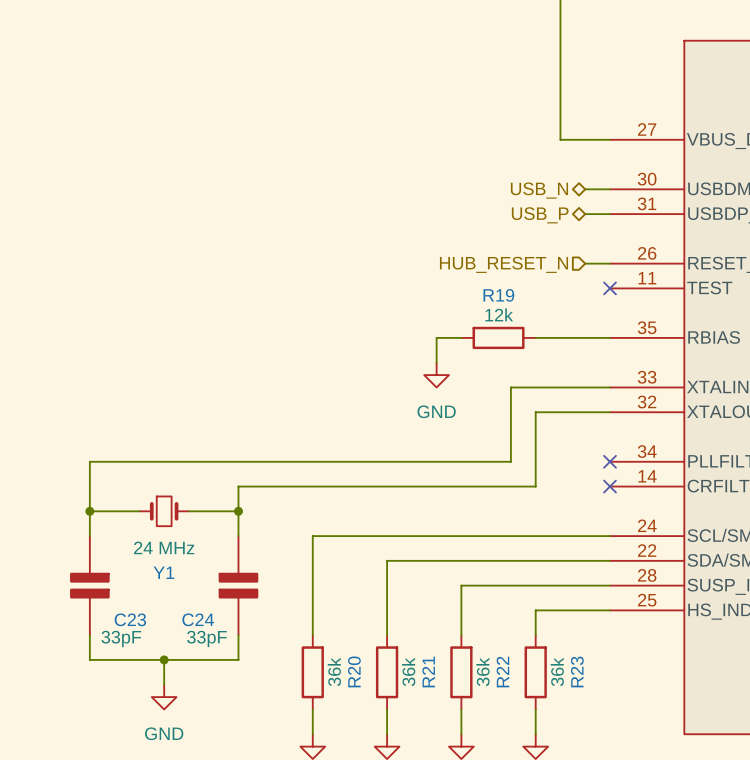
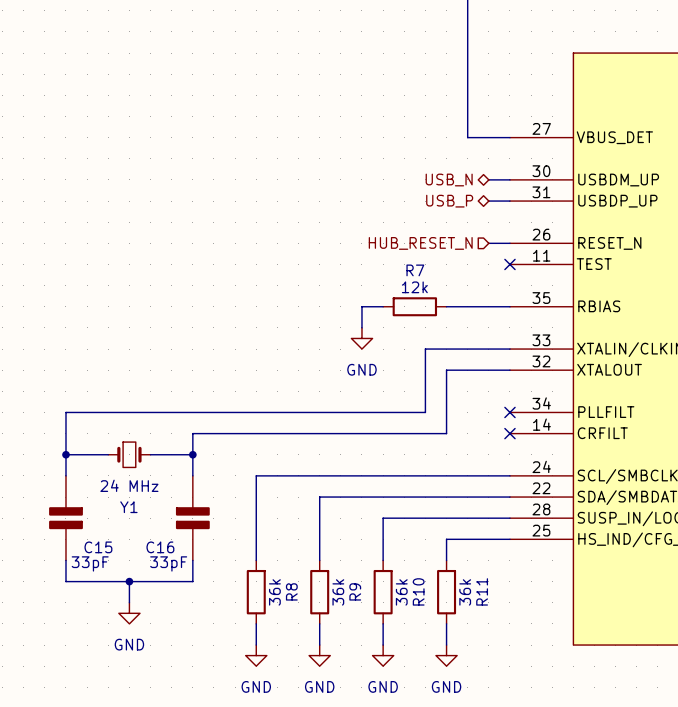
R19 name: R19 (498, 295) -> R7 (415, 270)
C23 name: C23 (130, 619) -> C15 (98, 547)
C24 name: C24 (198, 619) -> C16 (160, 547)
R20 name: R20 (354, 671) -> R8 (291, 591)
R23 name: R23 (577, 671) -> R11 (482, 591)
R21 name: R21 (428, 672) -> R9 (355, 591)
R22 name: R22 (502, 672) -> R10 (418, 591)

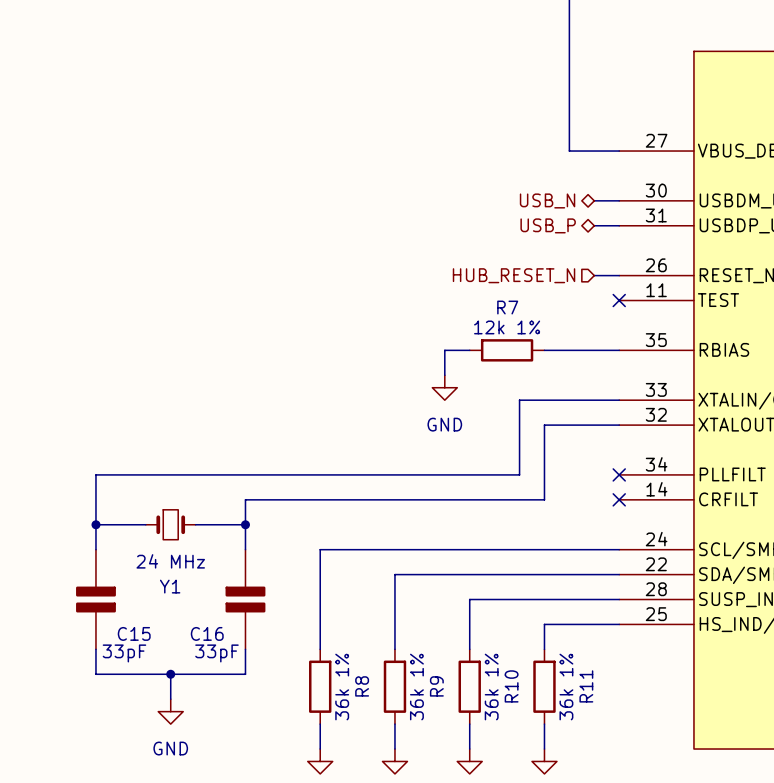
R7 value: 12k (414, 287) -> 12k 1% (507, 327)
R8 value: 36k (274, 592) -> 36k 1% (342, 687)
R9 value: 36k (338, 592) -> 36k 1% (416, 687)
R10 value: 36k (401, 592) -> 36k 1% (491, 687)
R11 value: 36k (465, 592) -> 36k 1% (566, 687)

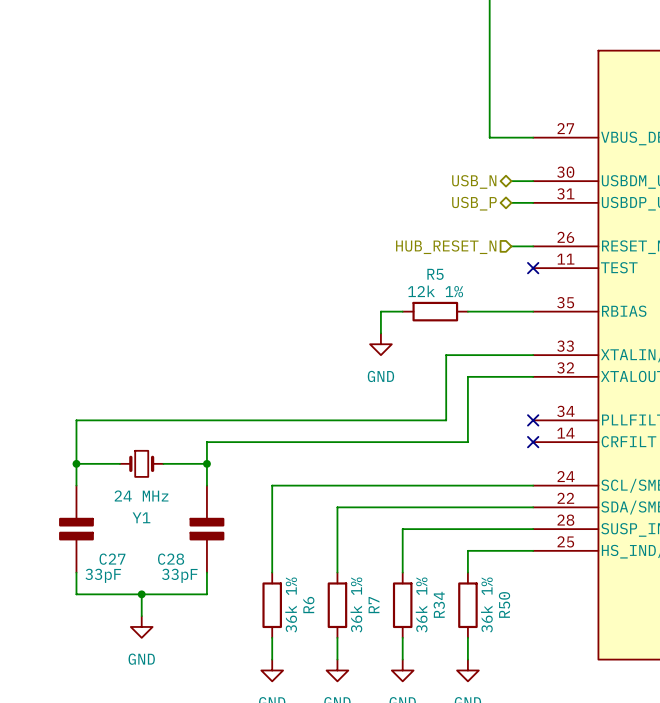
R7 name: R7 (507, 307) -> R5 (435, 274)
C15 name: C15 (134, 633) -> C27 (112, 559)
C16 name: C16 (207, 633) -> C28 (171, 559)
R8 name: R8 (362, 686) -> R6 (308, 605)
R9 name: R9 (436, 686) -> R7 (374, 605)
R10 name: R10 (511, 686) -> R34 (439, 604)
R11 name: R11 (586, 686) -> R50 (504, 604)

